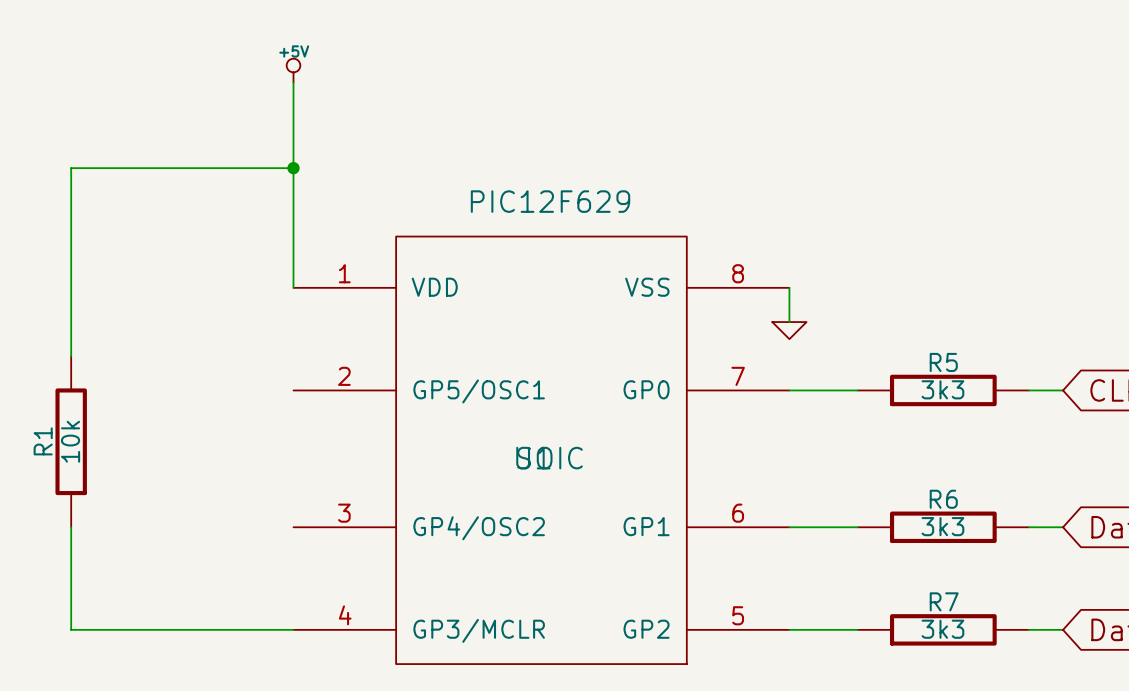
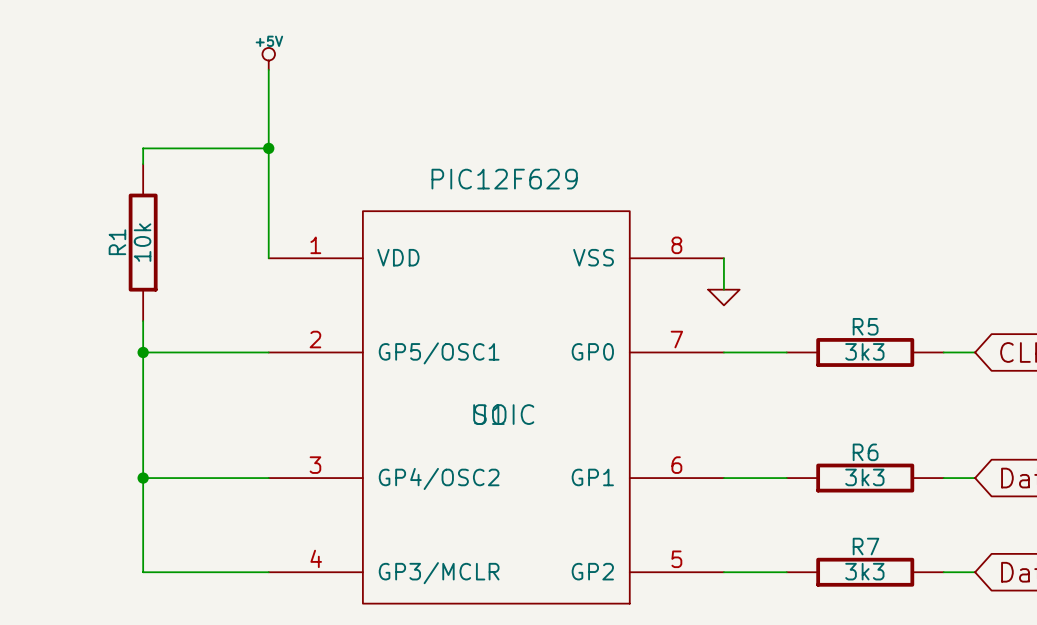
wire: (156, 168) (71, 168) (71, 356) -> (143, 148) (143, 164)
wire: none -> (143, 352) (268, 352)
junction: none -> (143, 352)
R1 position: (71, 441) -> (143, 242)
wire: (71, 527) (71, 629) (156, 629) -> (143, 321) (143, 572)
wire: none -> (143, 478) (268, 478)
junction: none -> (143, 478)

